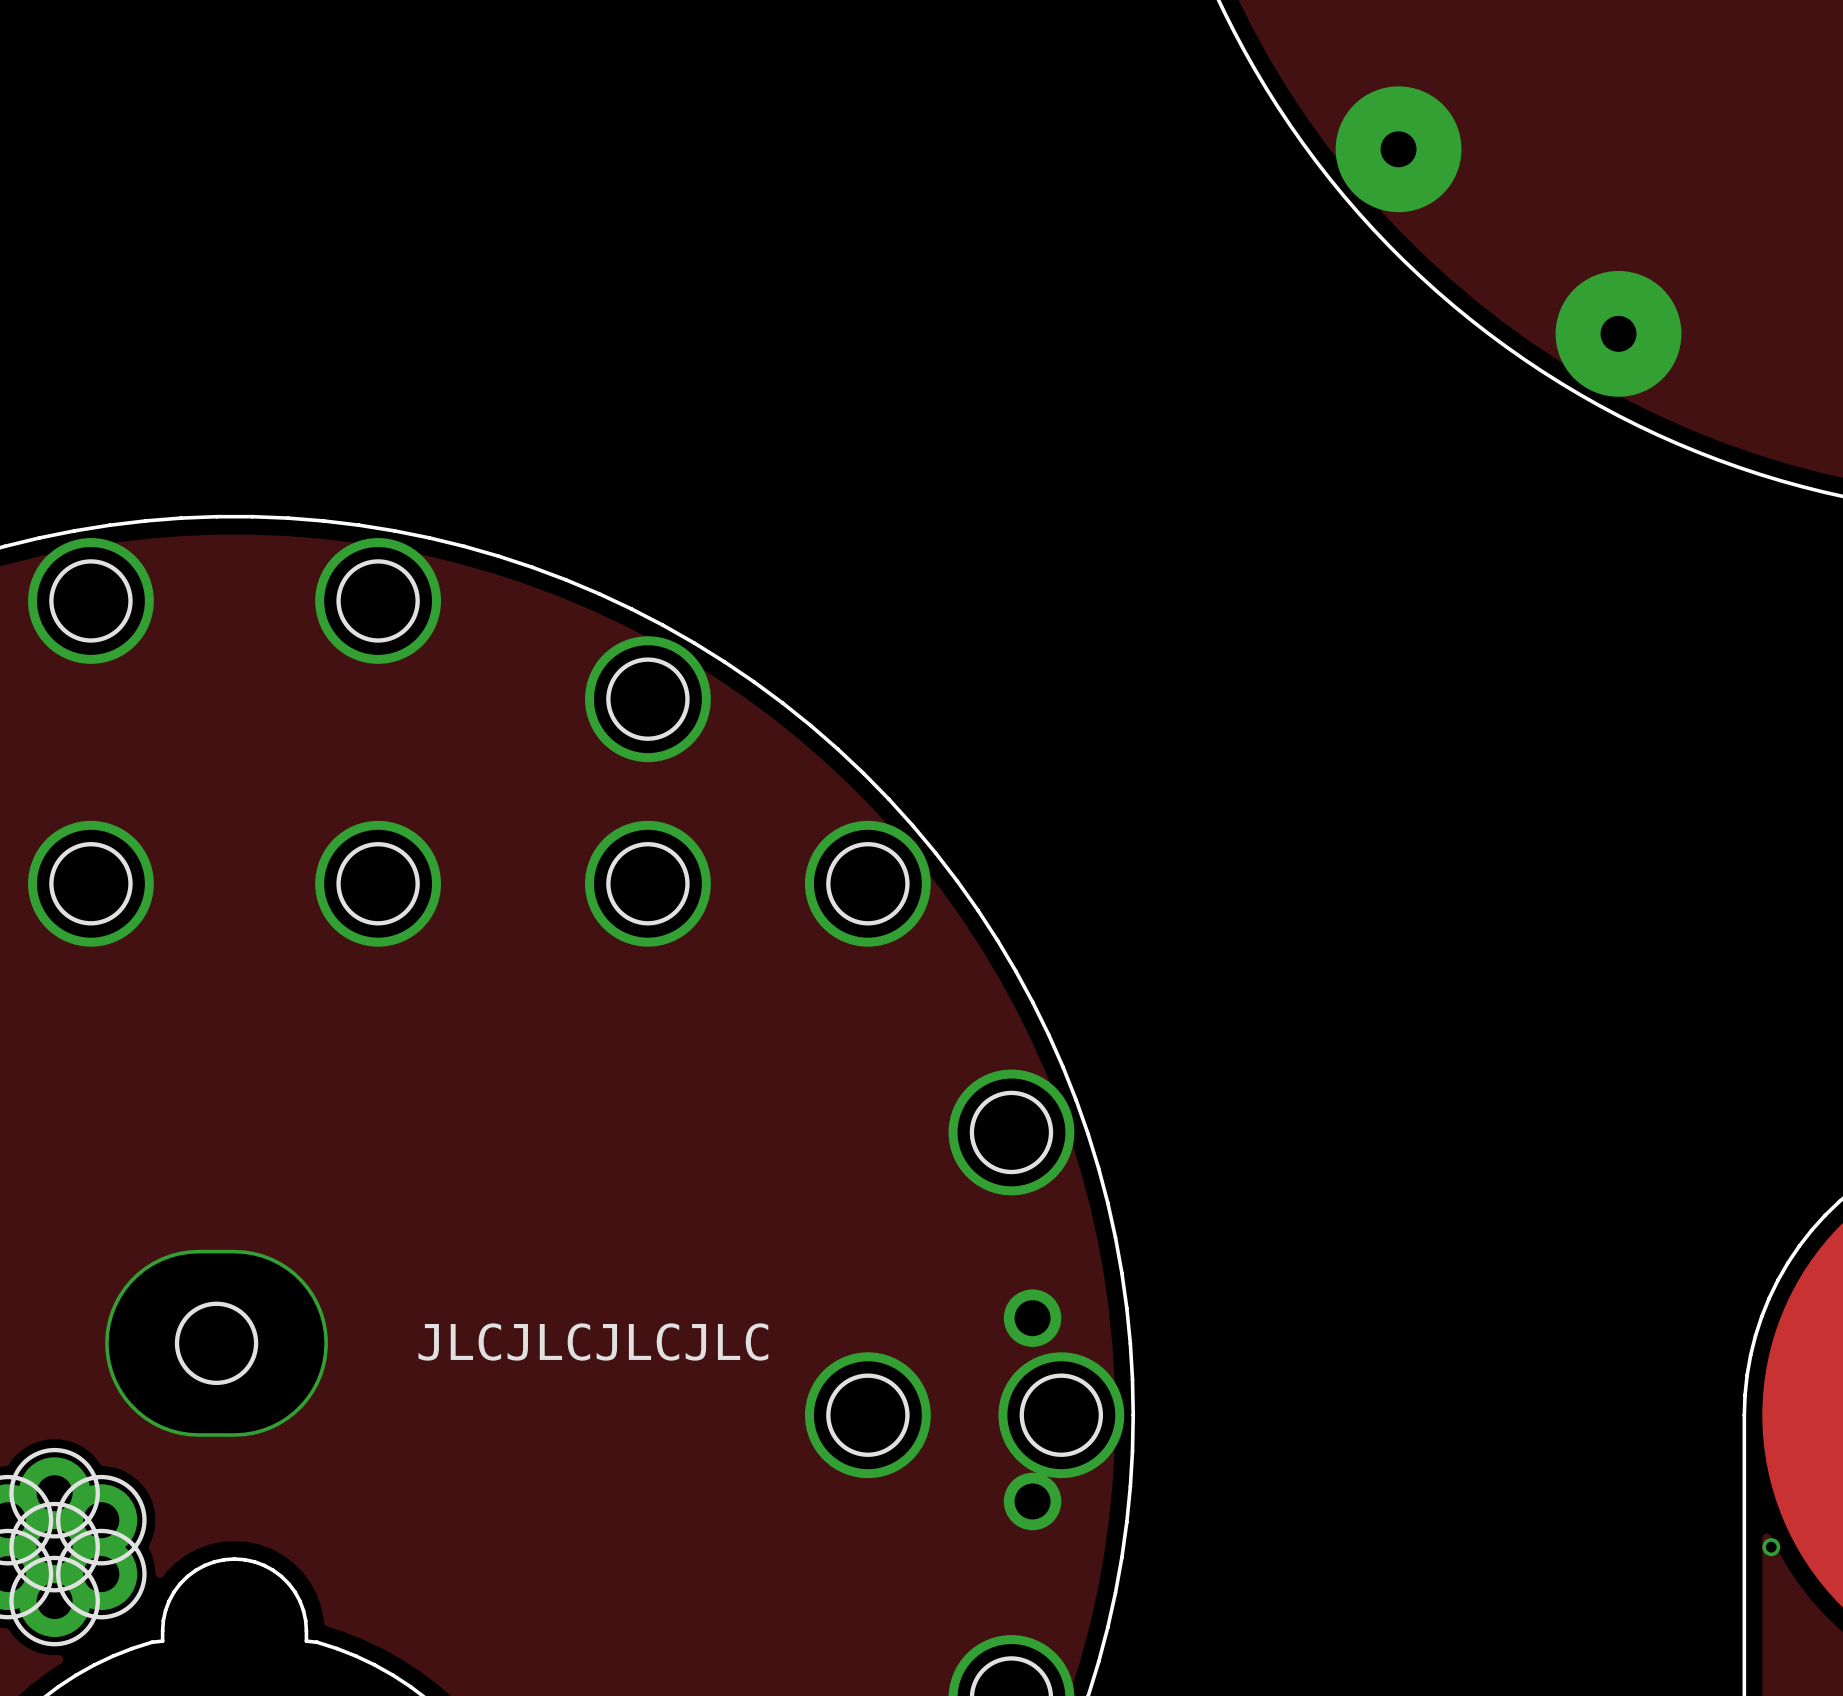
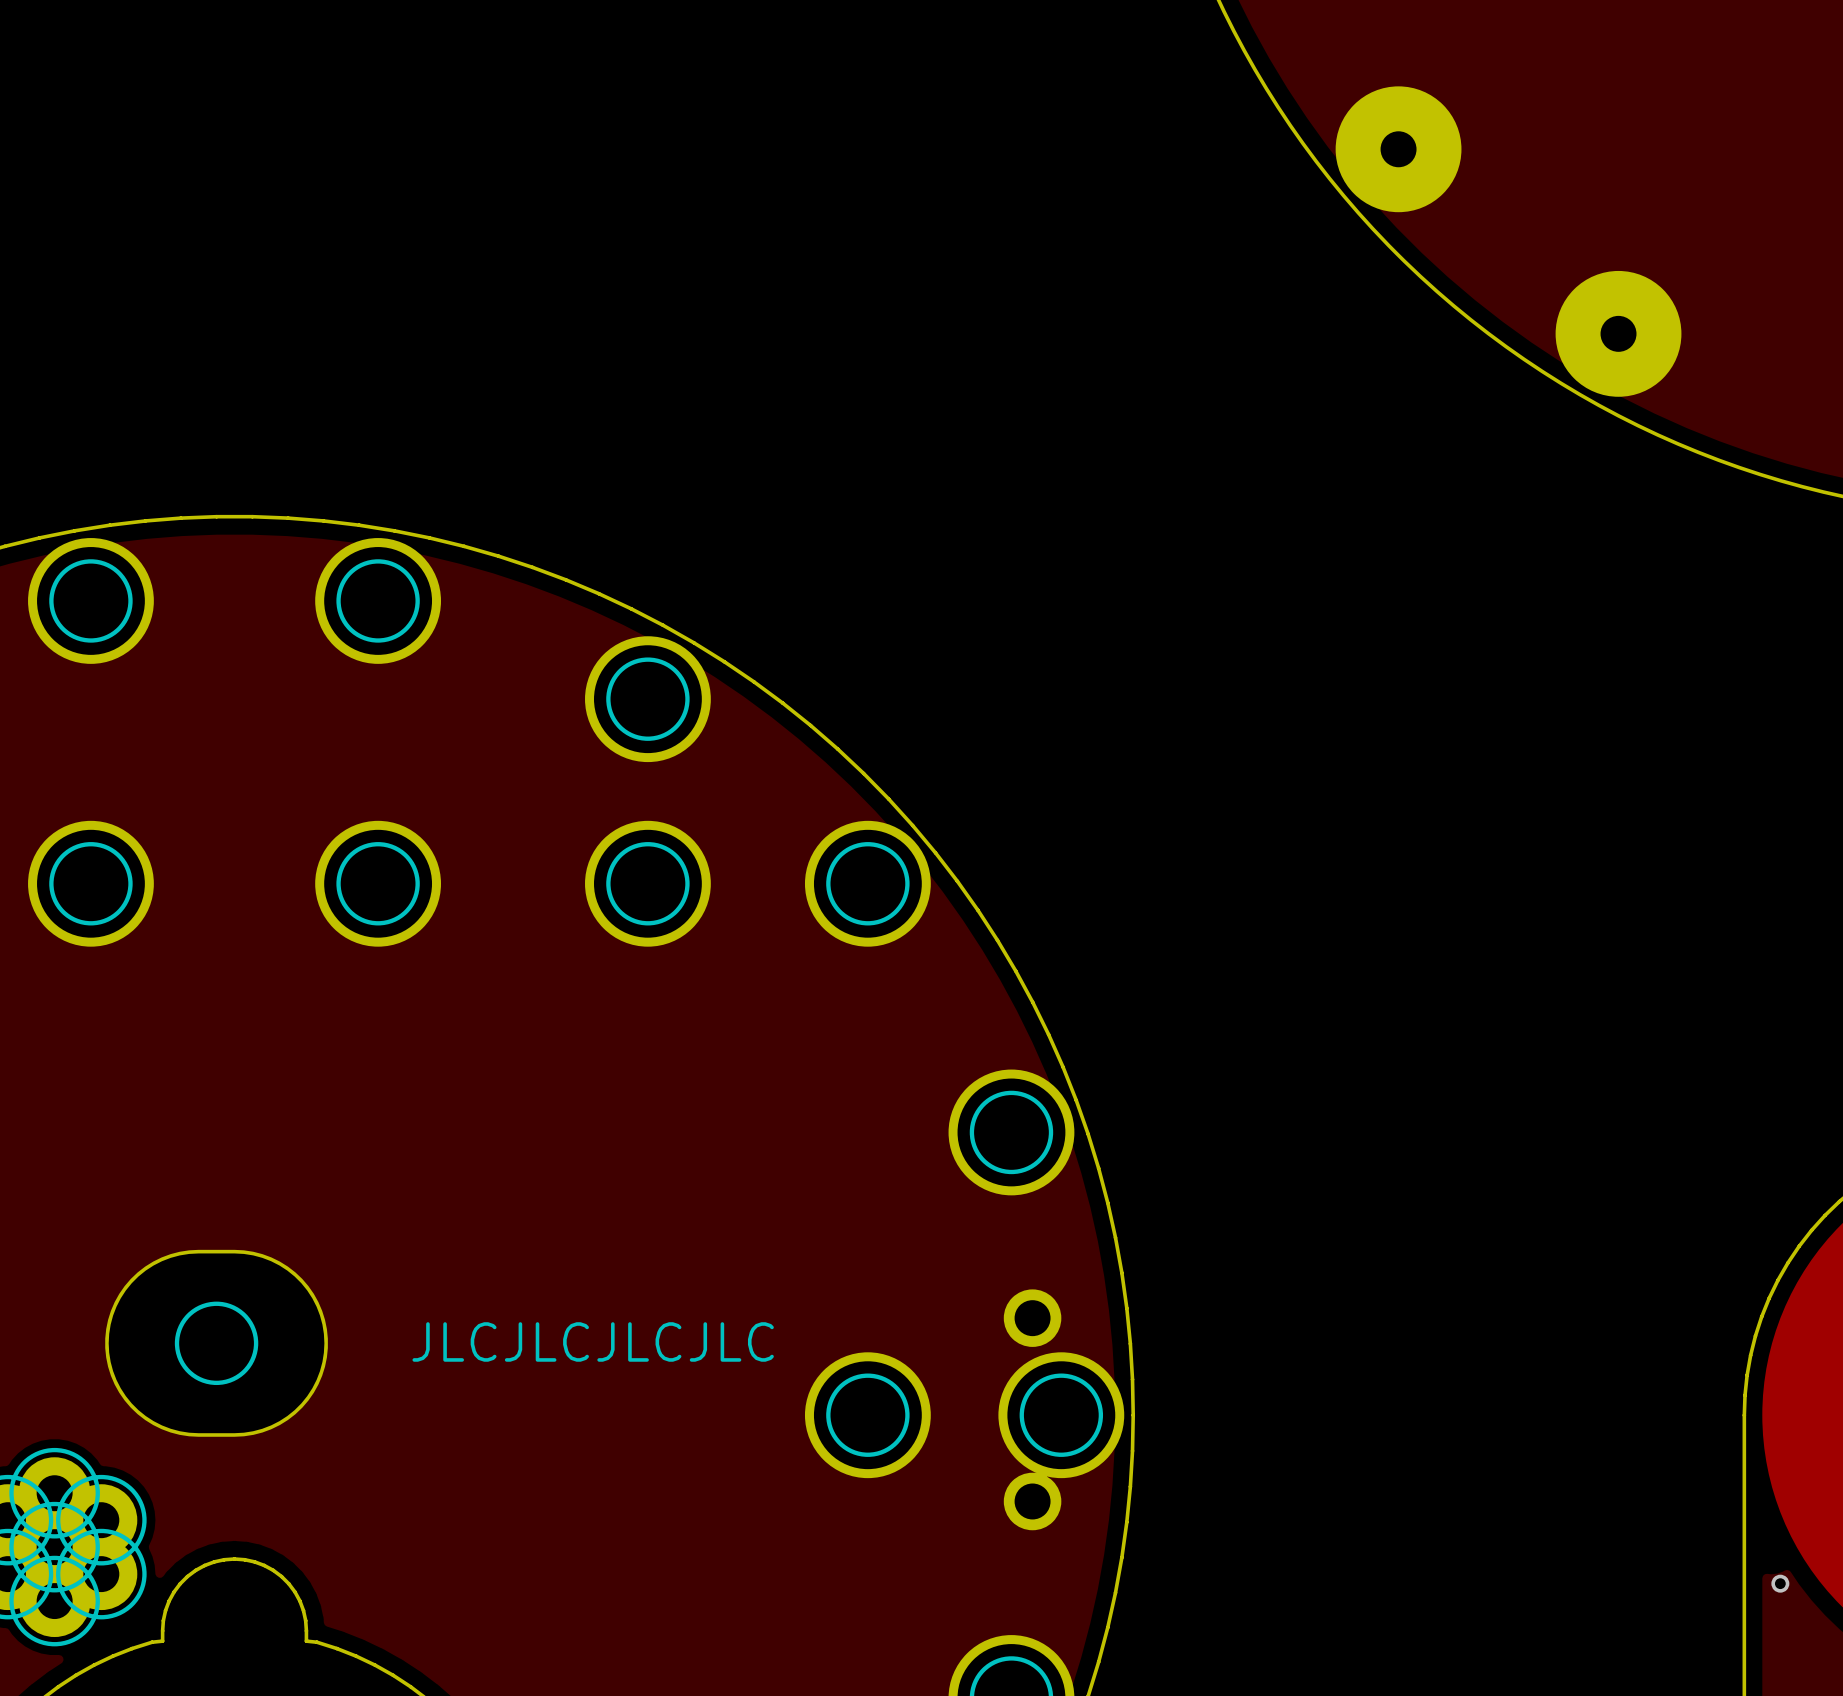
via position: (1771, 1547) -> (1780, 1583)

